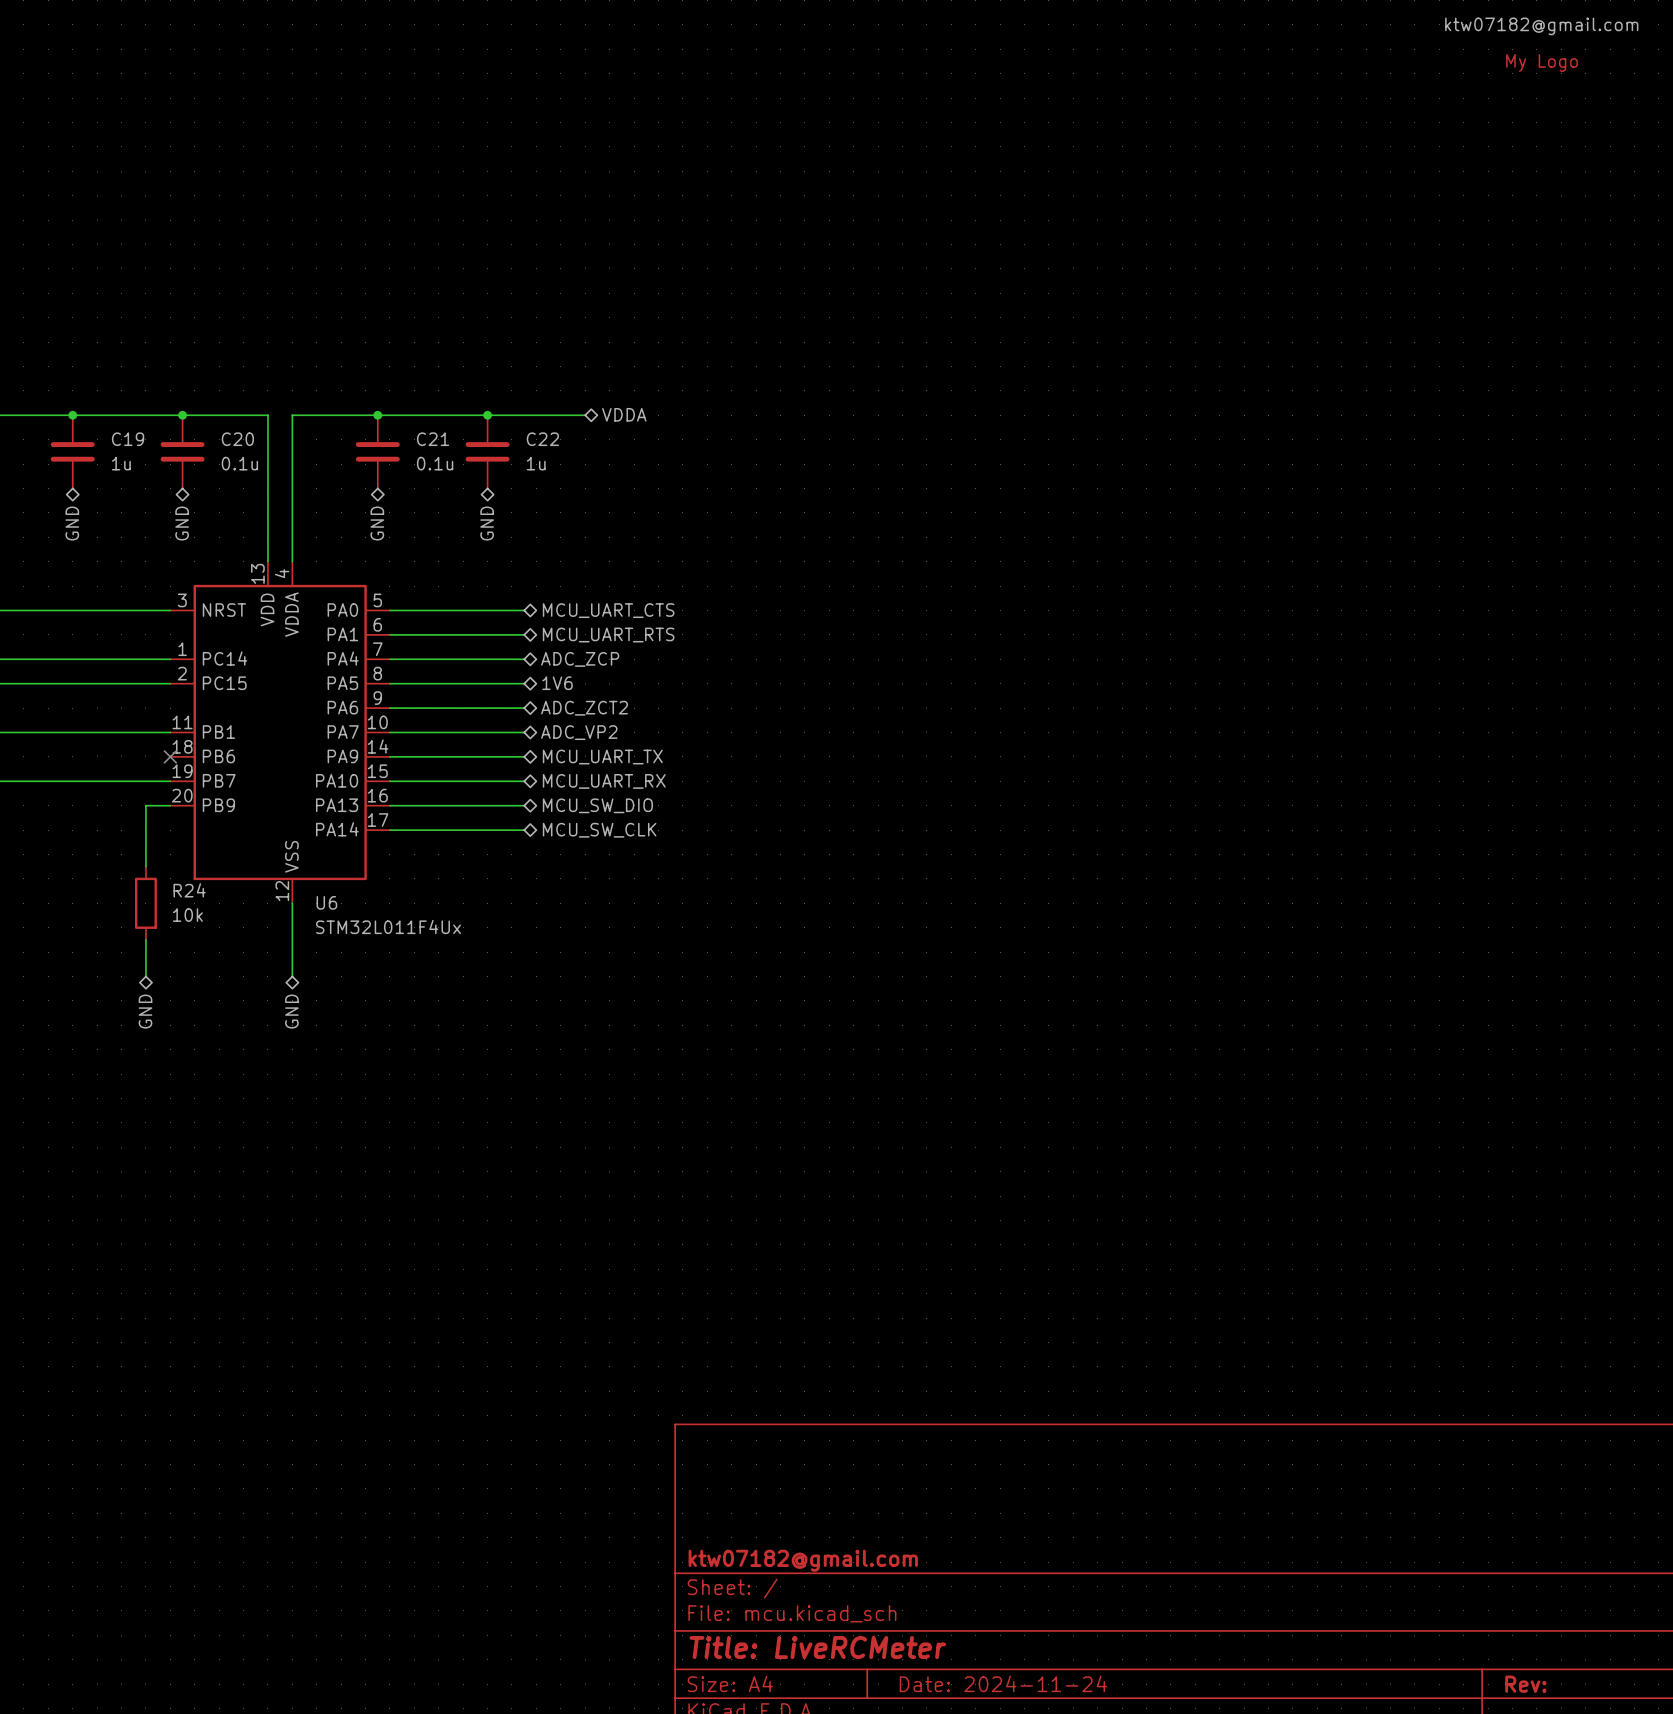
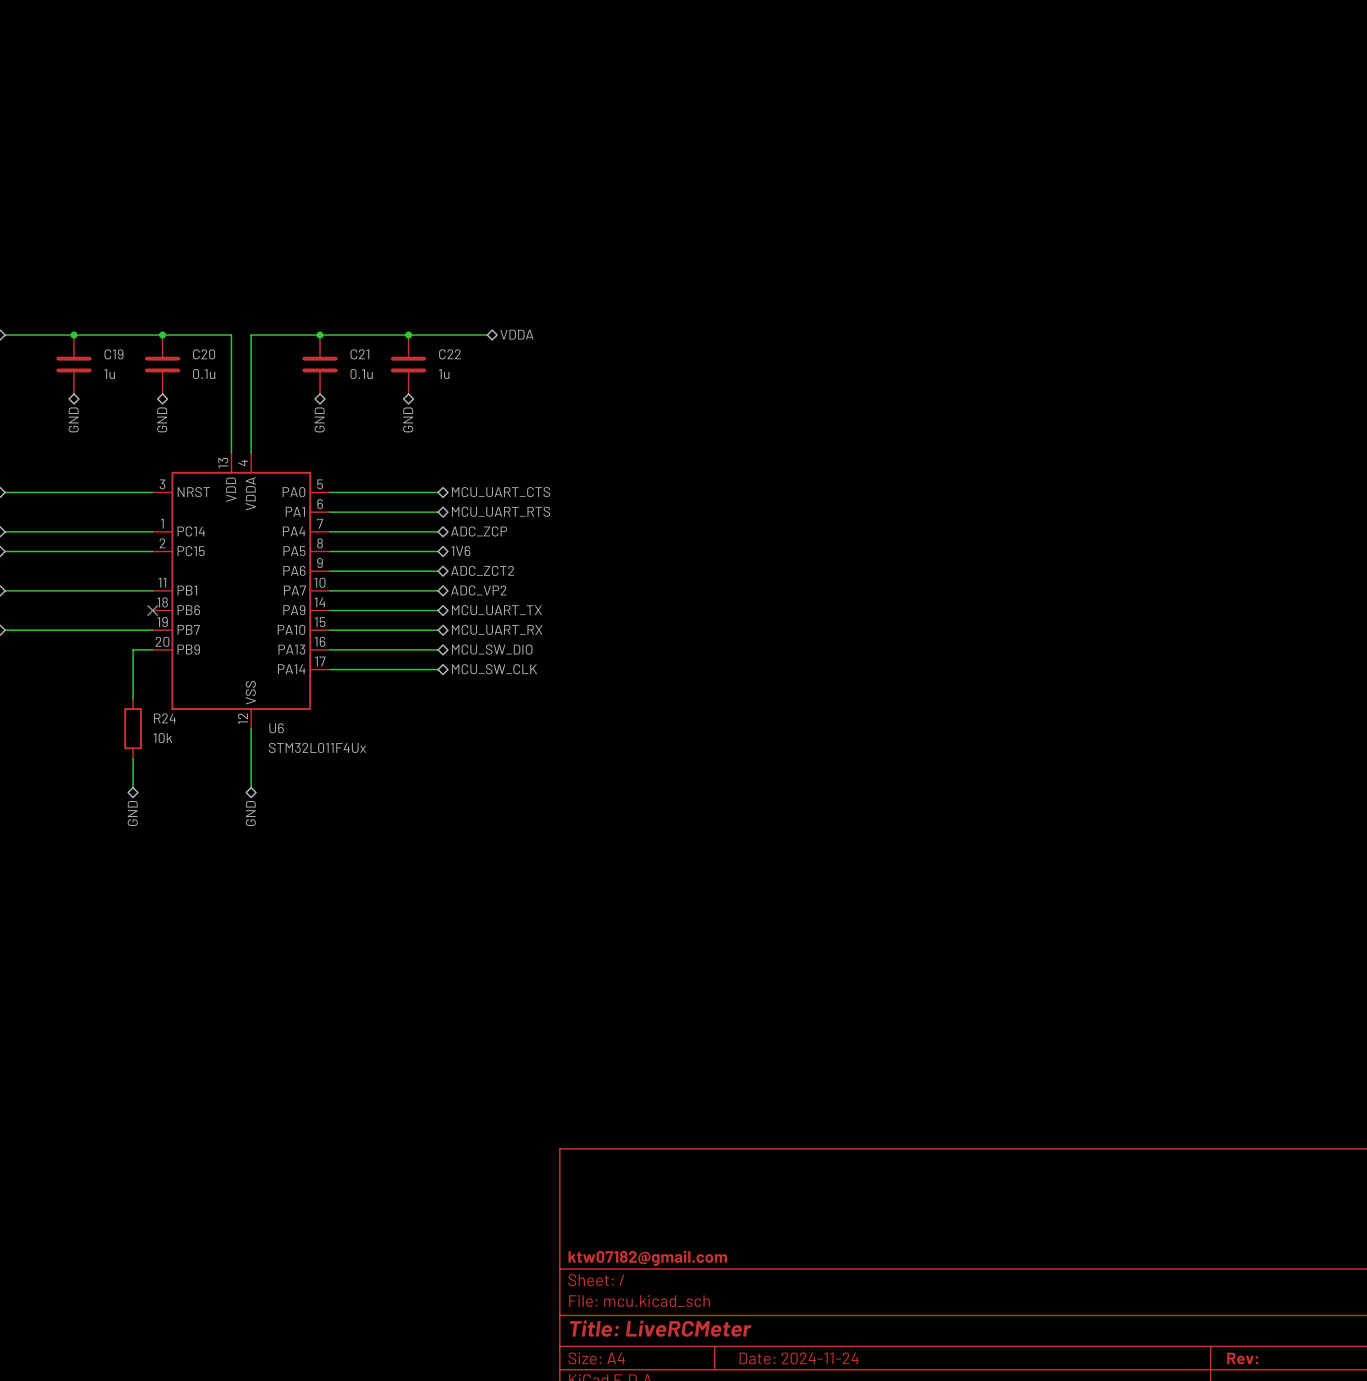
part: ktw07182@gmail.com (1541, 44) -> none

